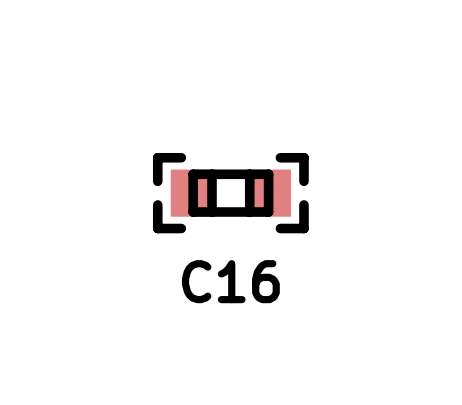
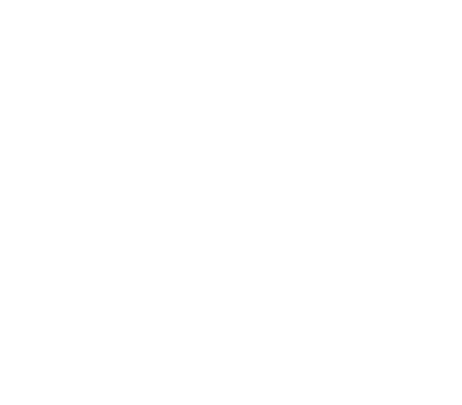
C16: (230, 193) -> none

